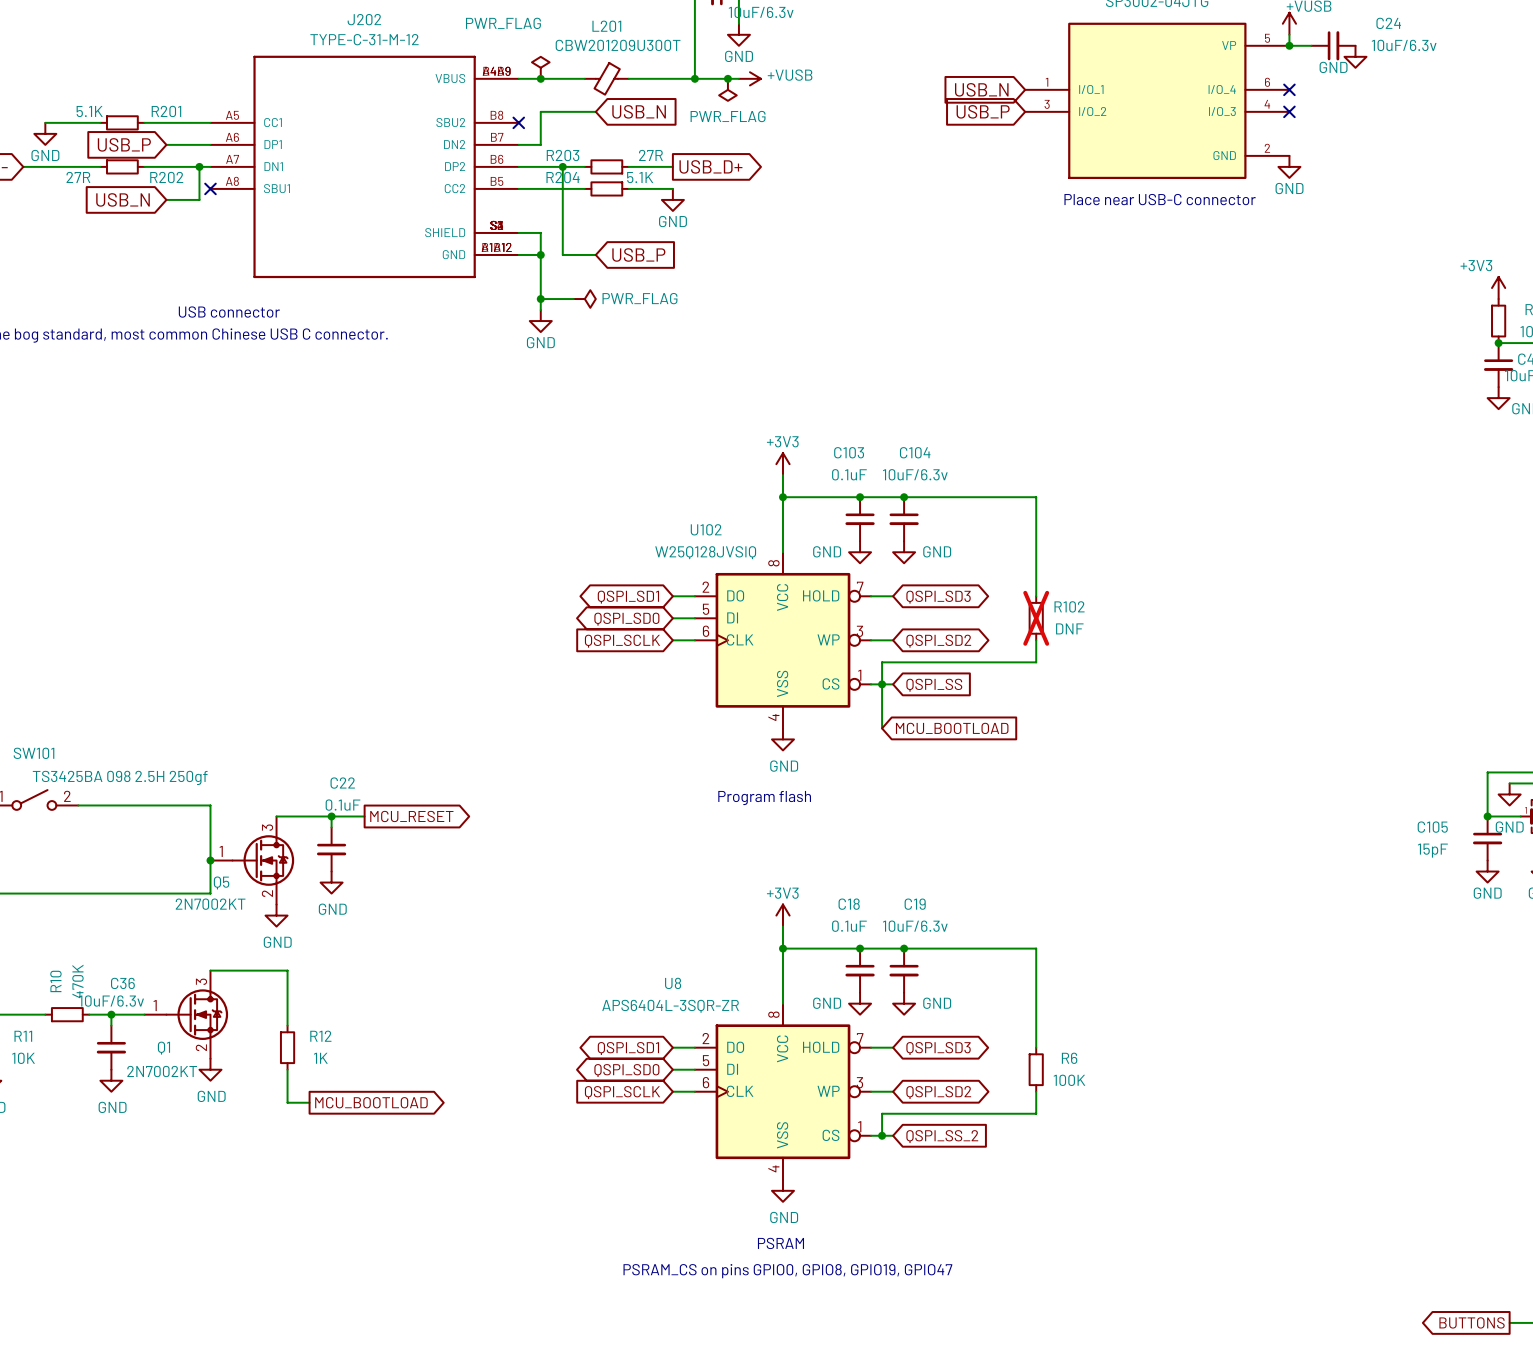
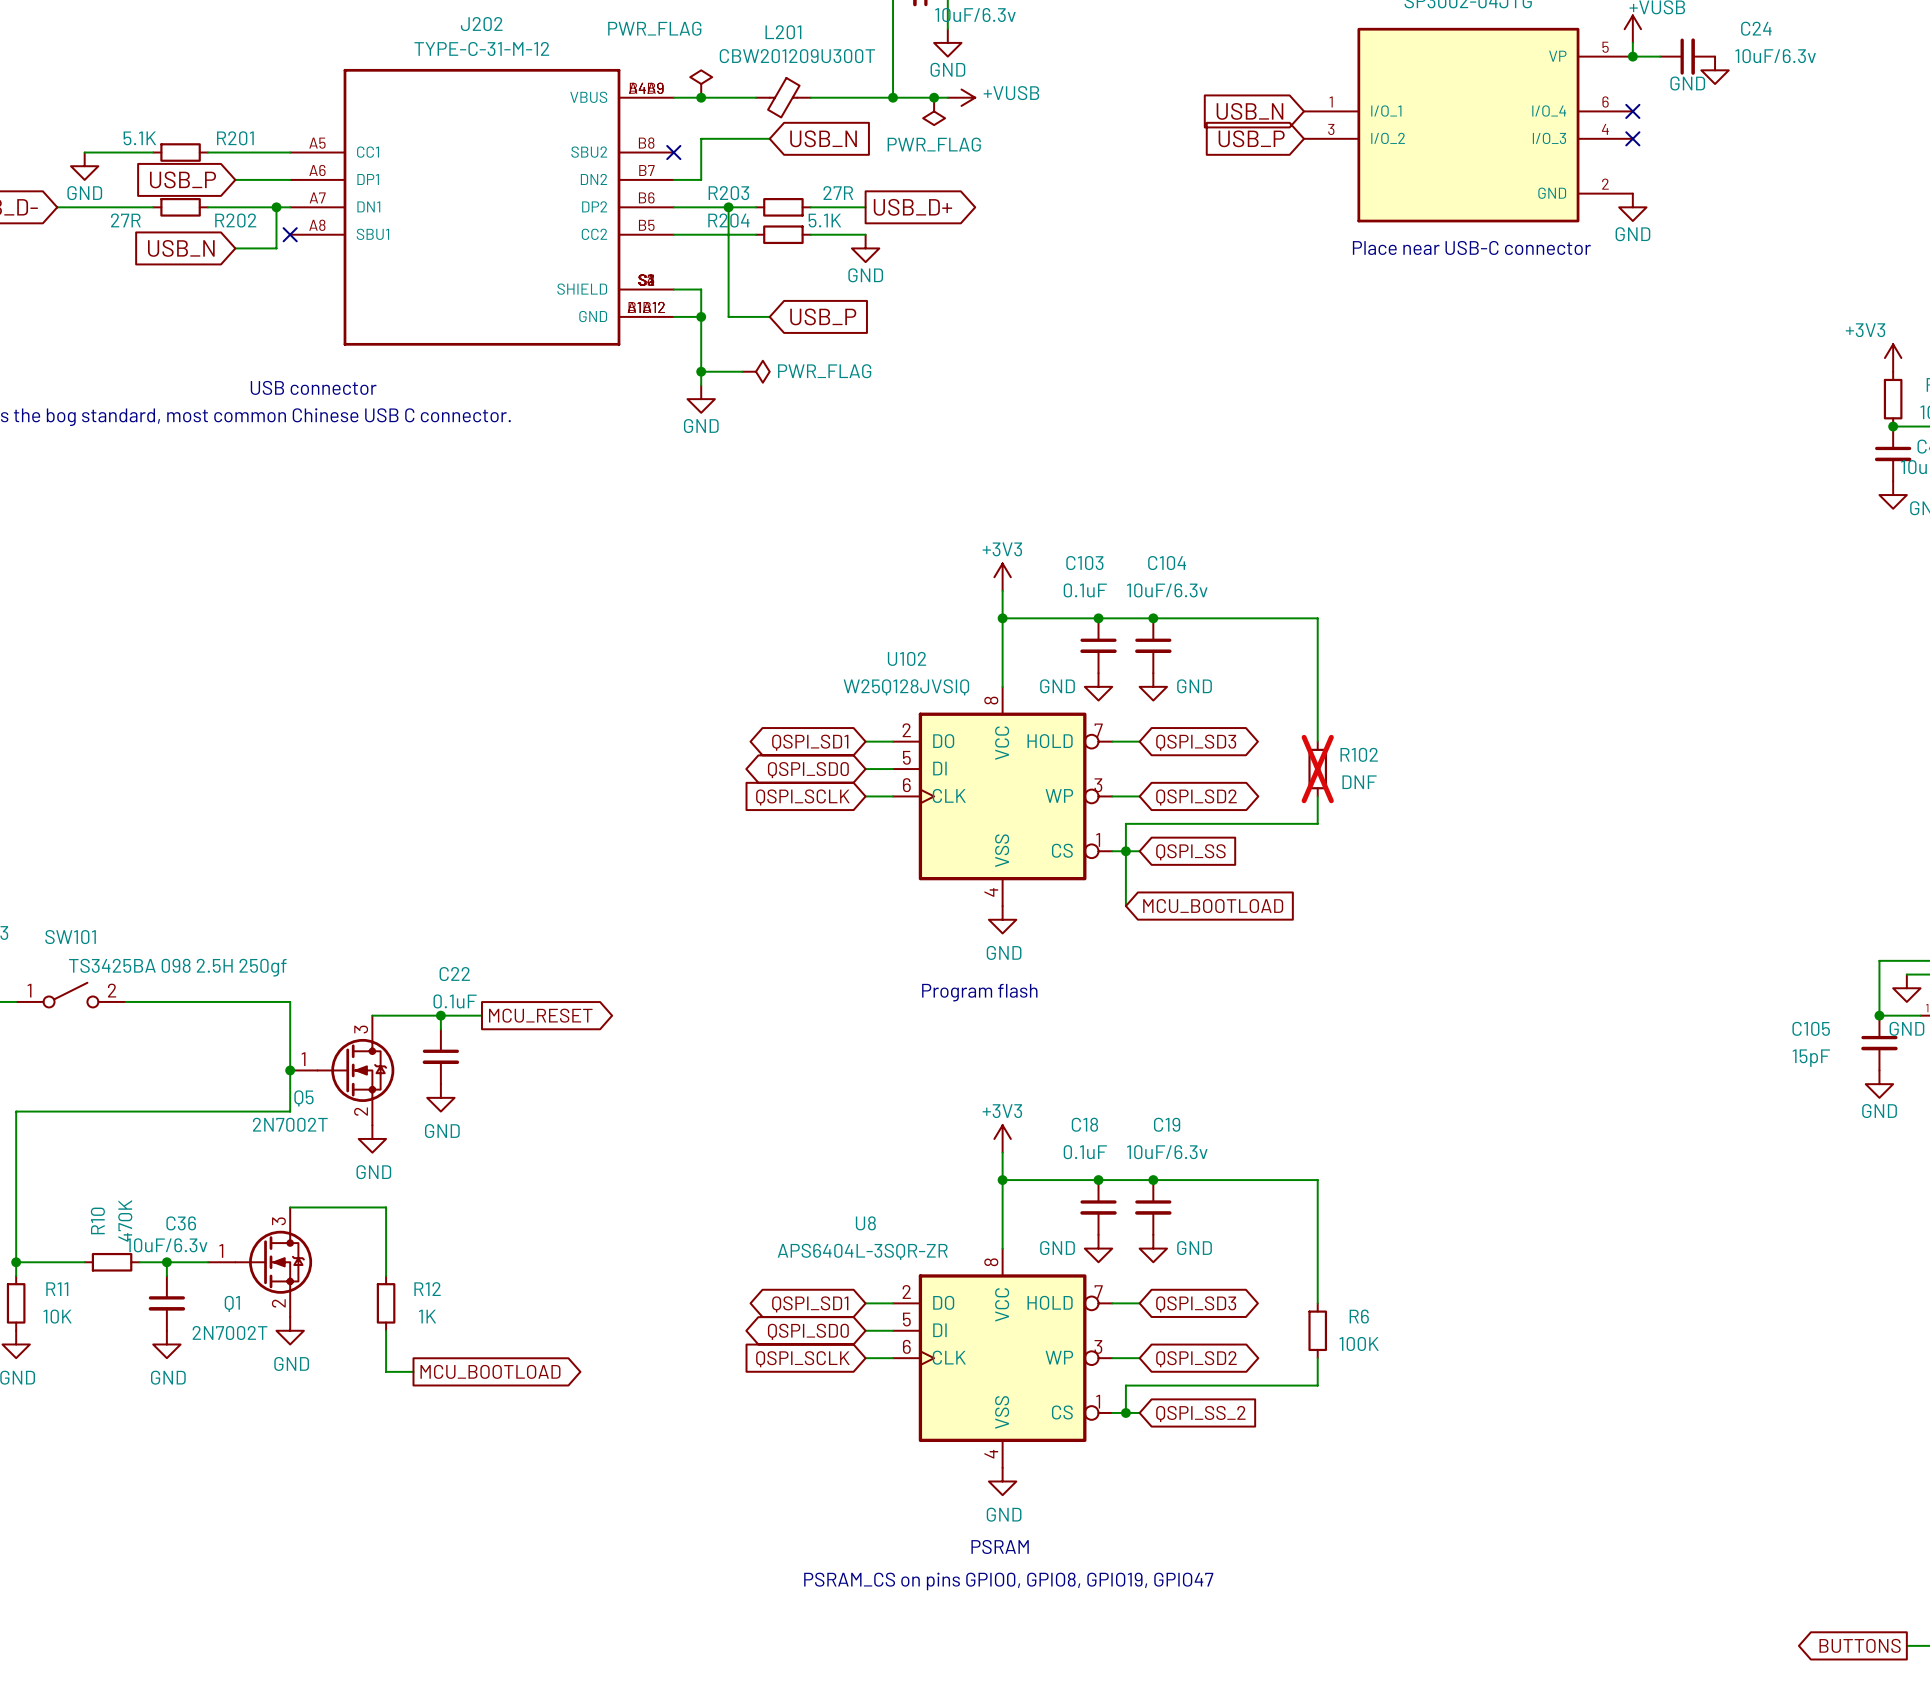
Q5 value: 2N7002KT (210, 904) -> 2N7002T (290, 1124)
Q1 value: 2N7002KT (162, 1071) -> 2N7002T (230, 1333)

